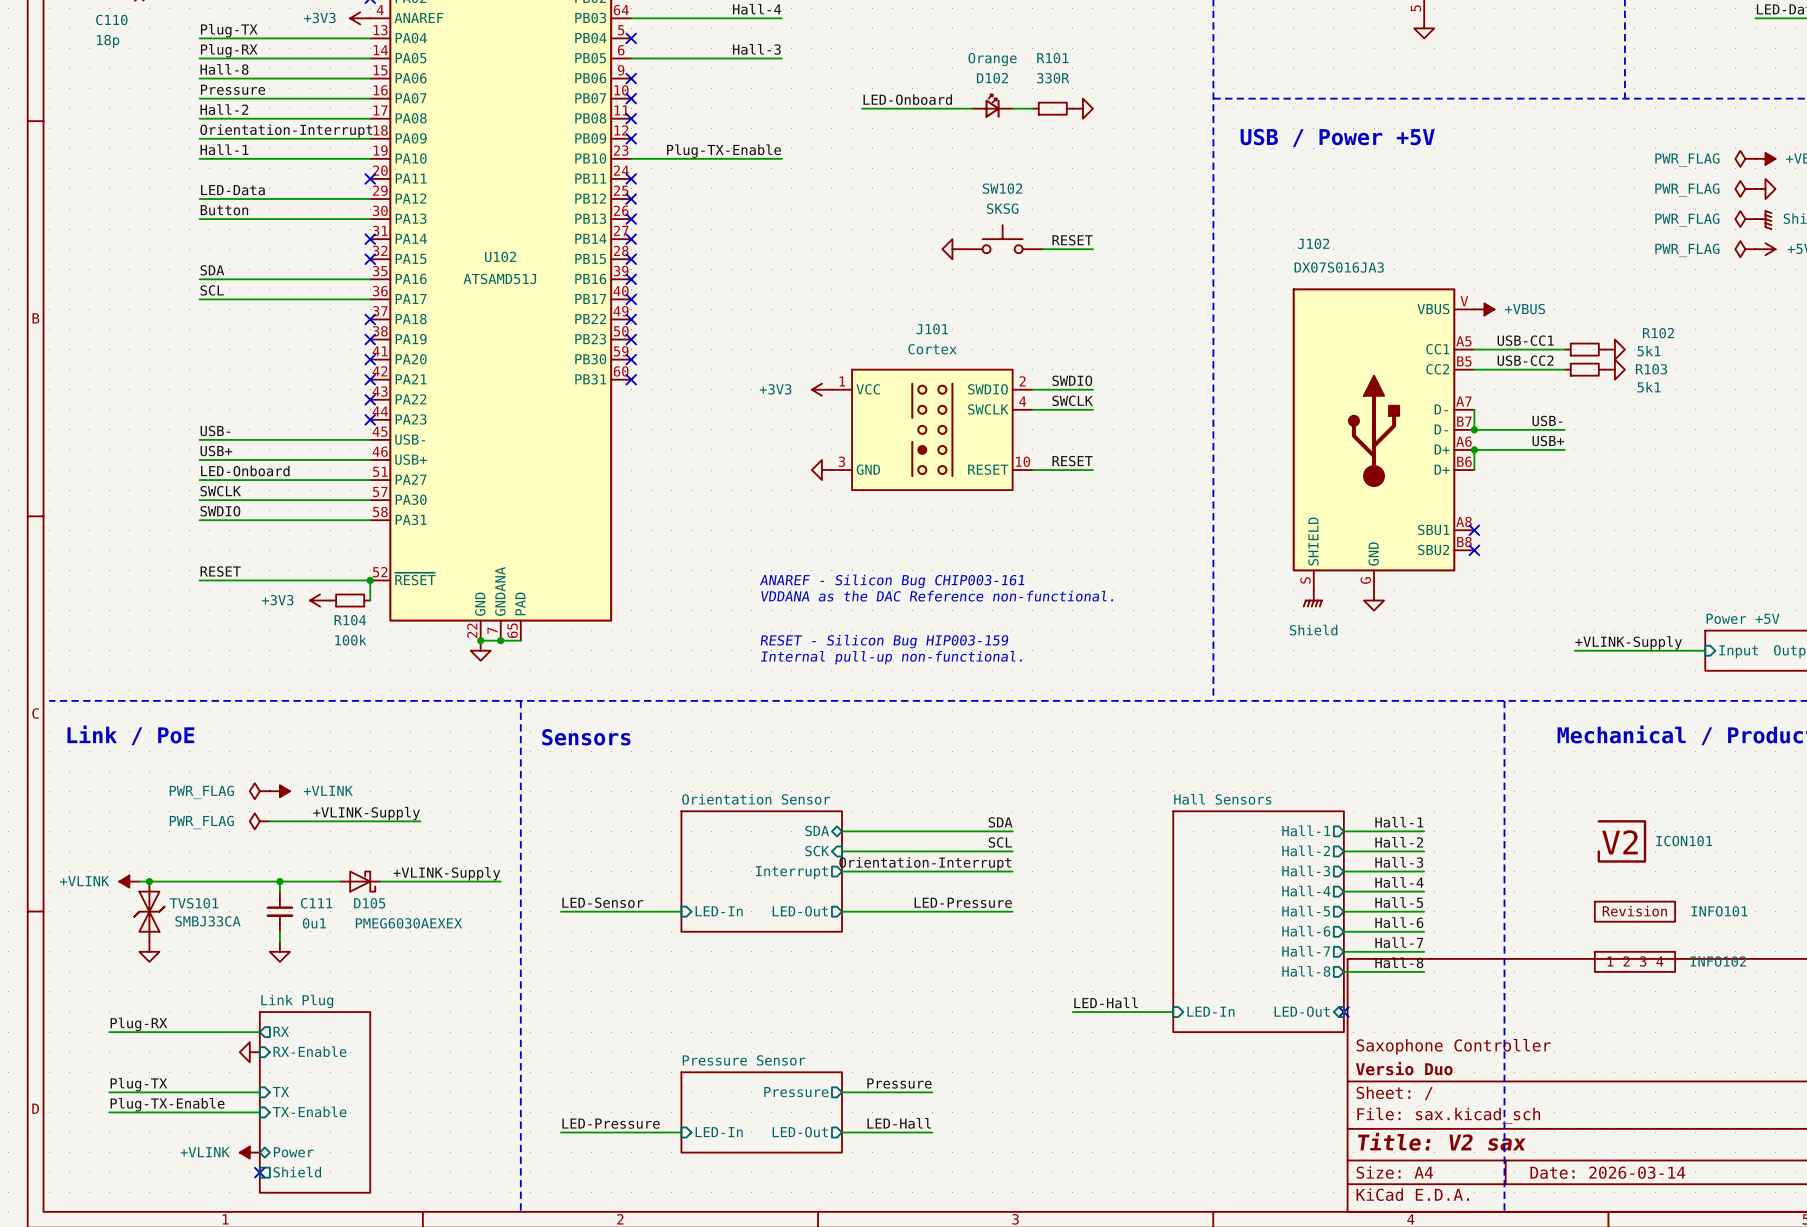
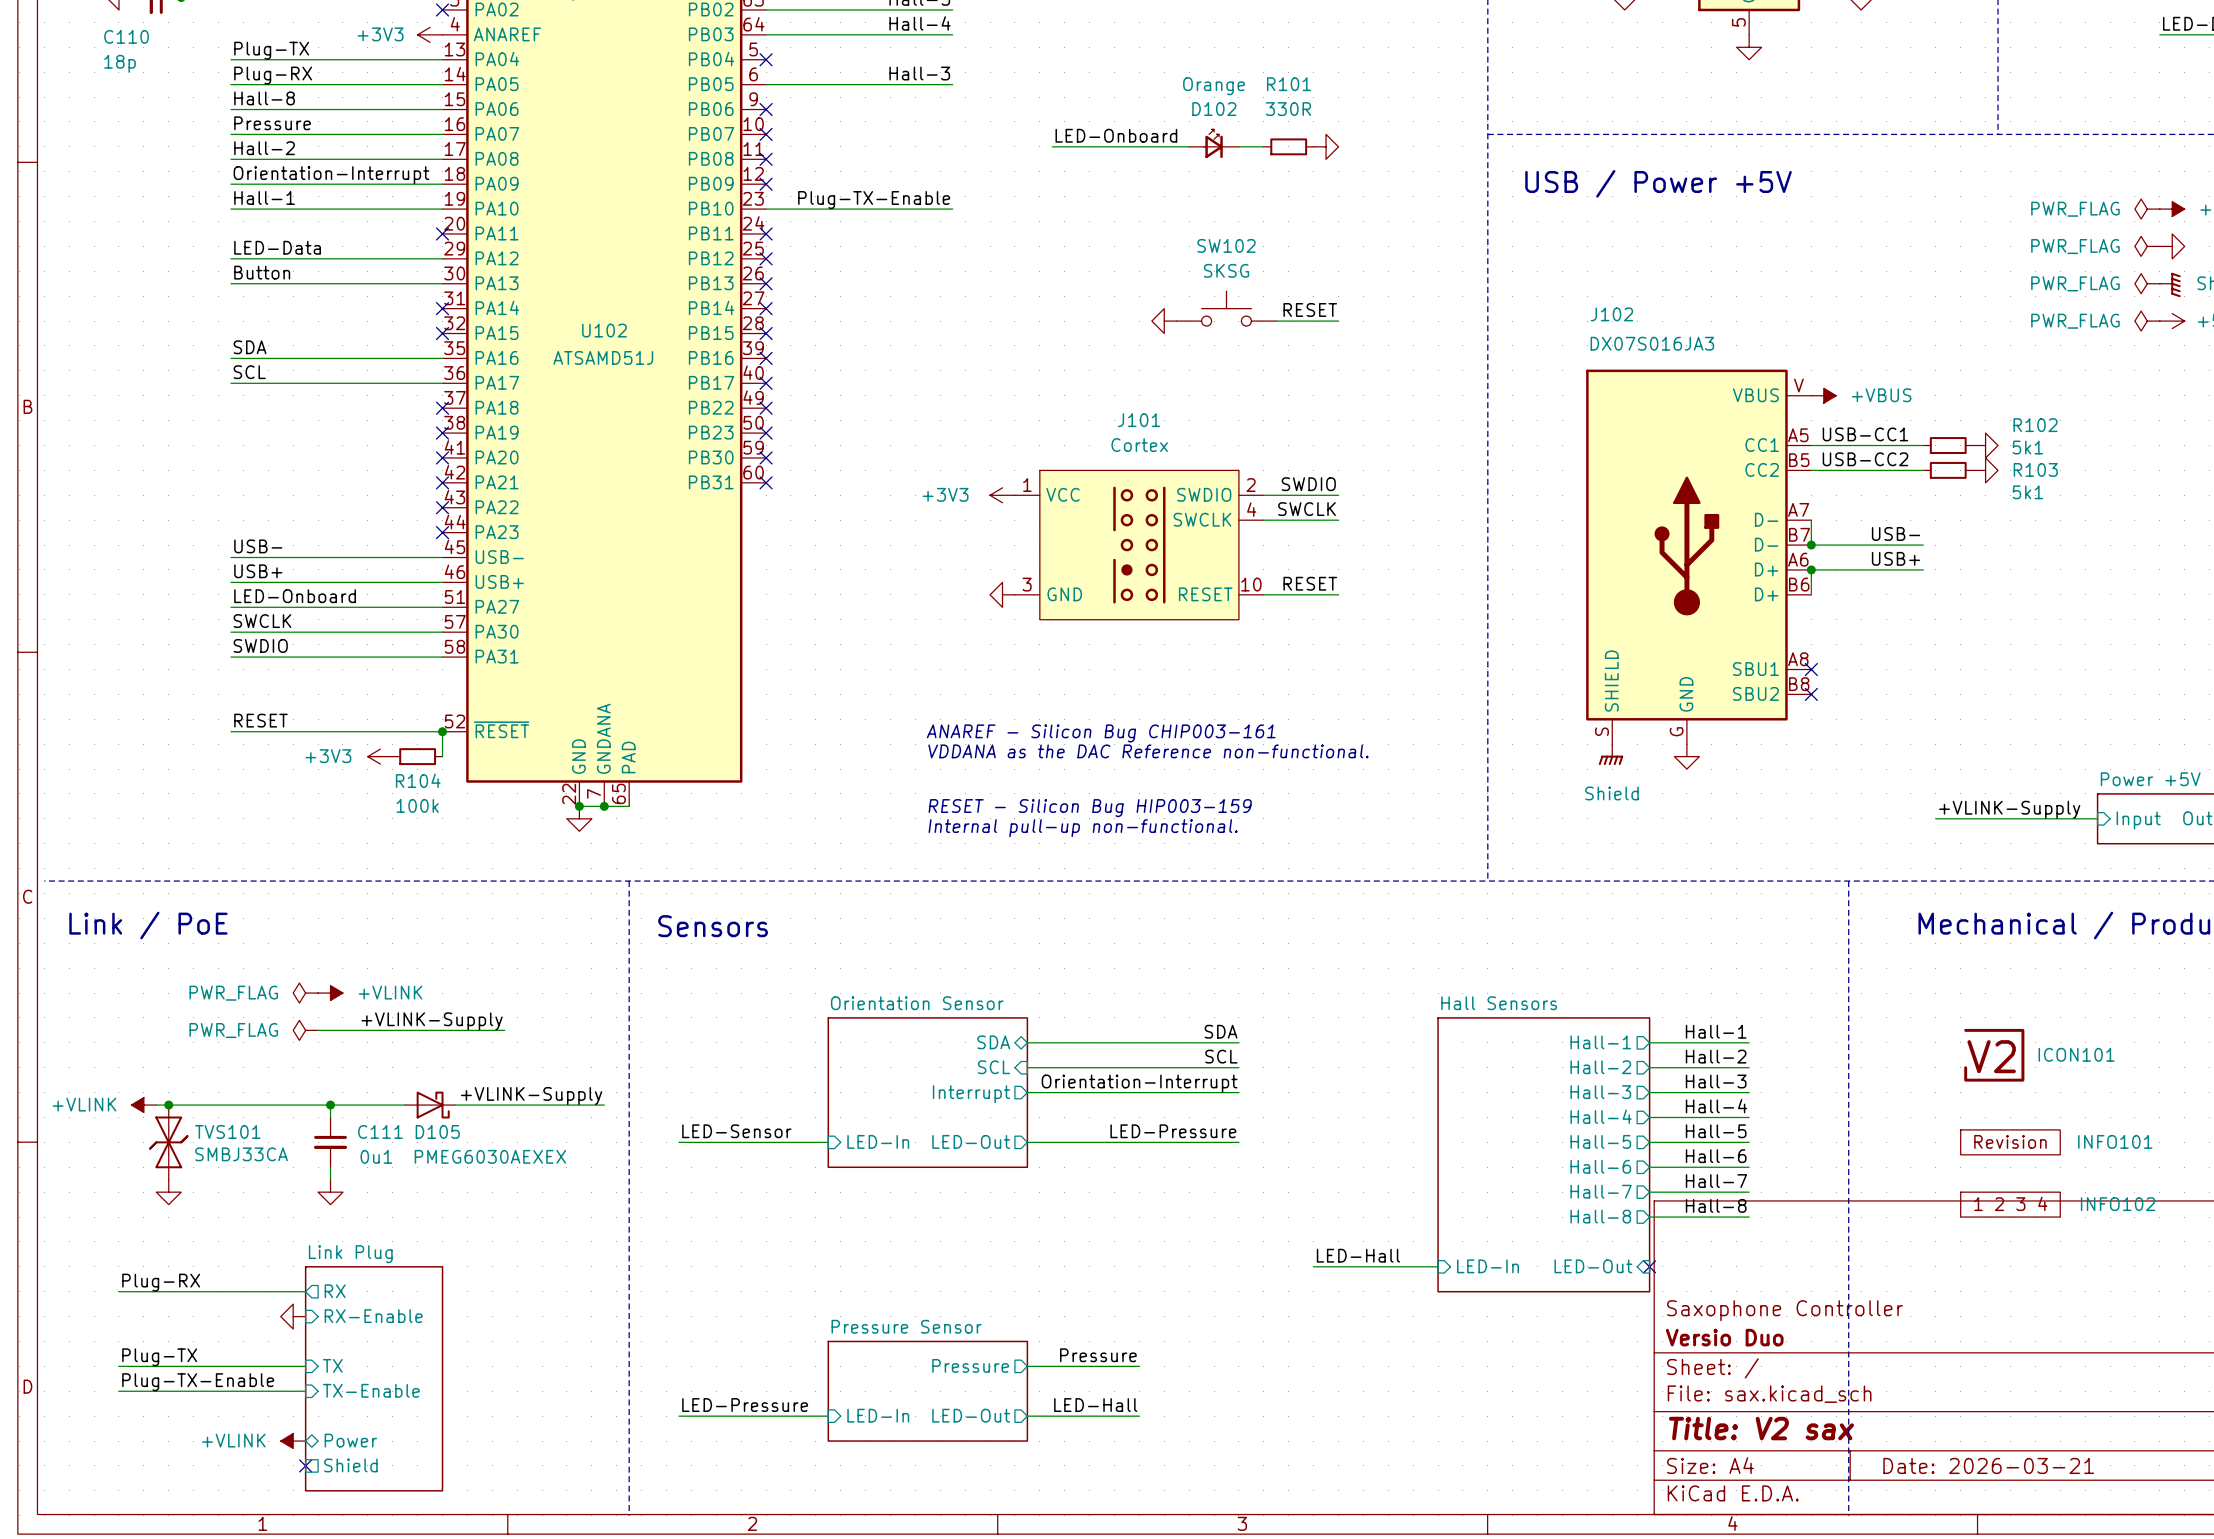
sheet pin: SCK (817, 851) -> SCL (994, 1067)
title block: Date: 2026-03-14 (1607, 1172) -> Date: 2026-03-21 (1988, 1465)

